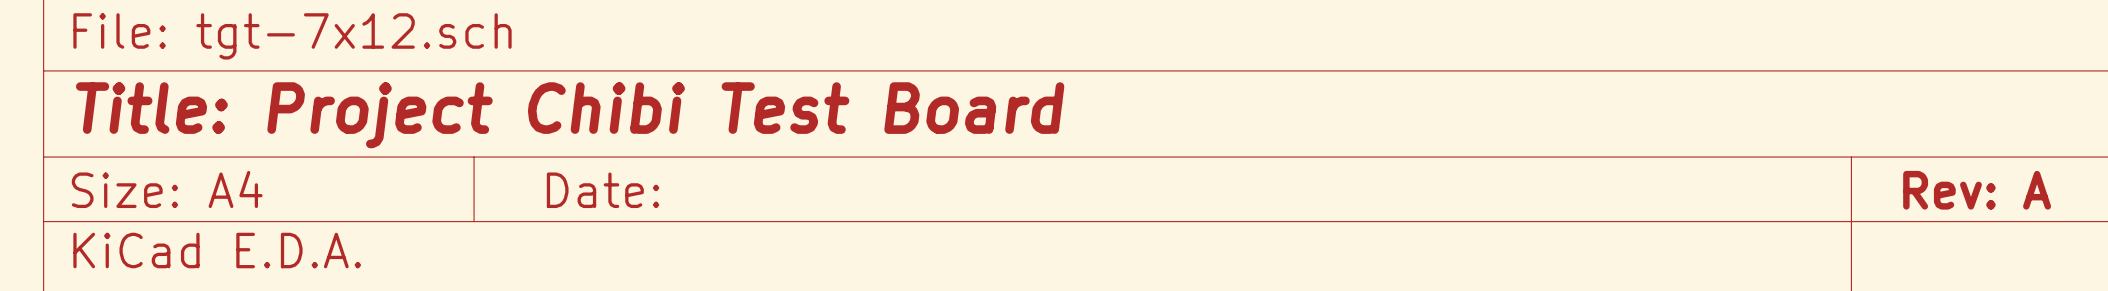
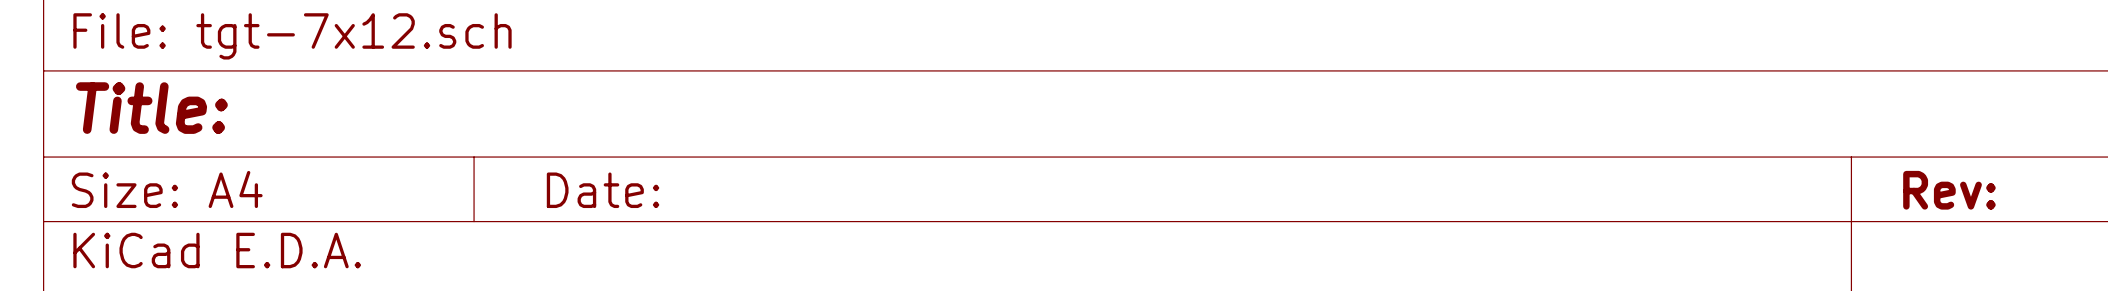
title block: Title: Project Chibi Test Board (570, 115) -> Title: (151, 108)
title block: Rev: A (1977, 190) -> Rev: (1949, 190)

